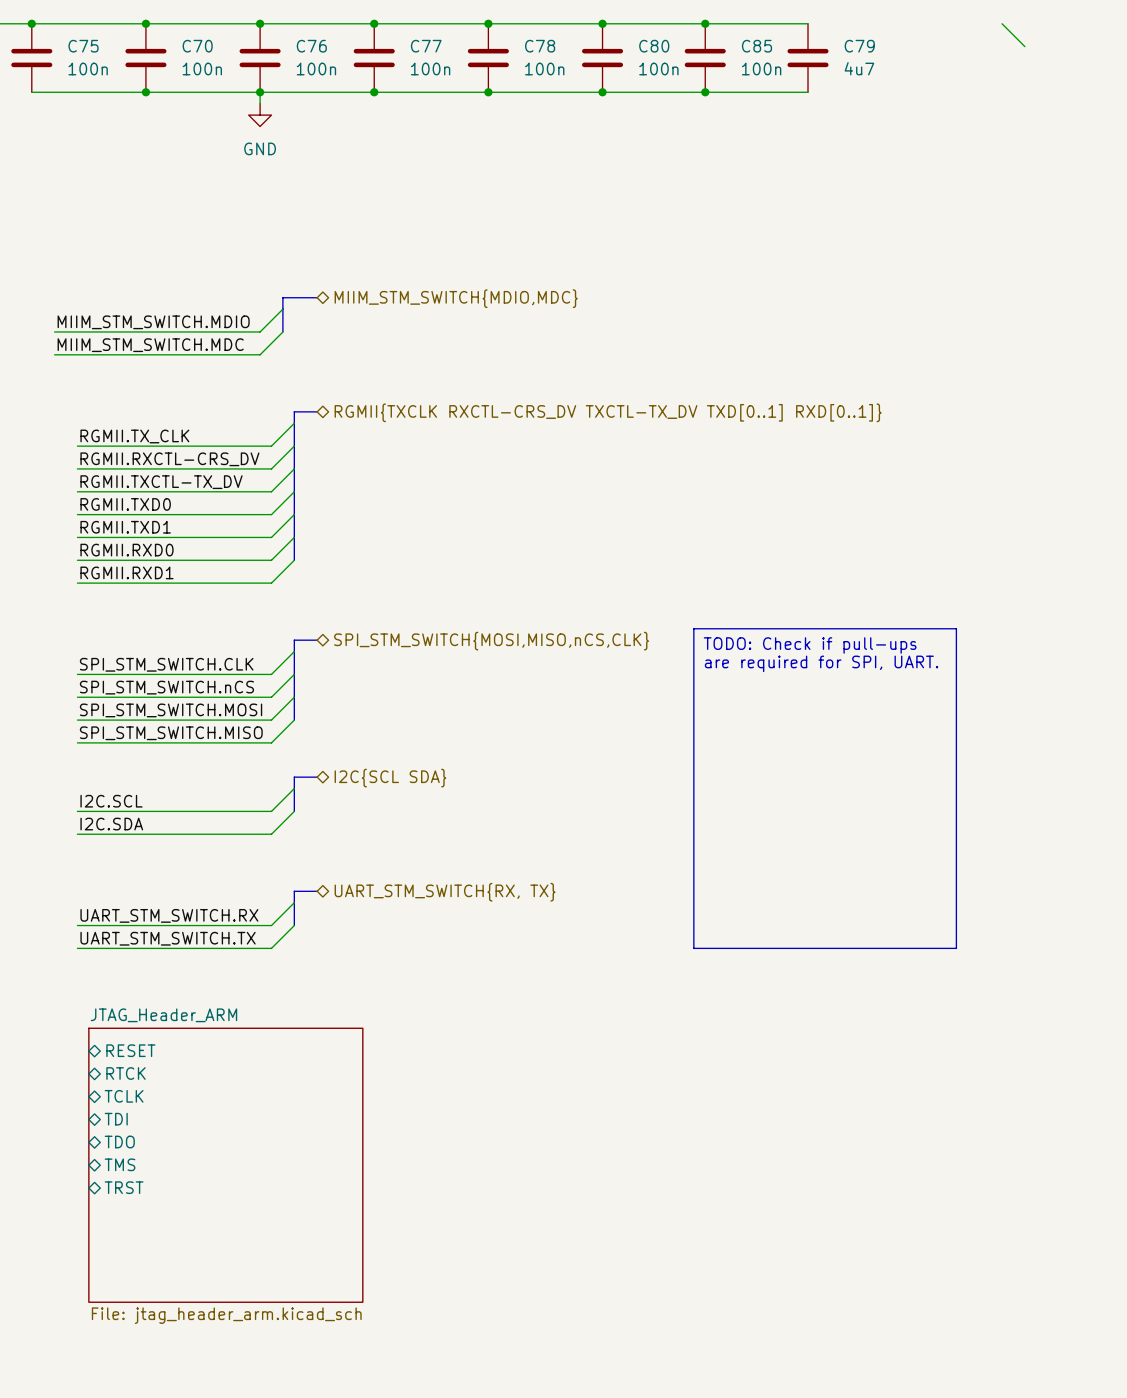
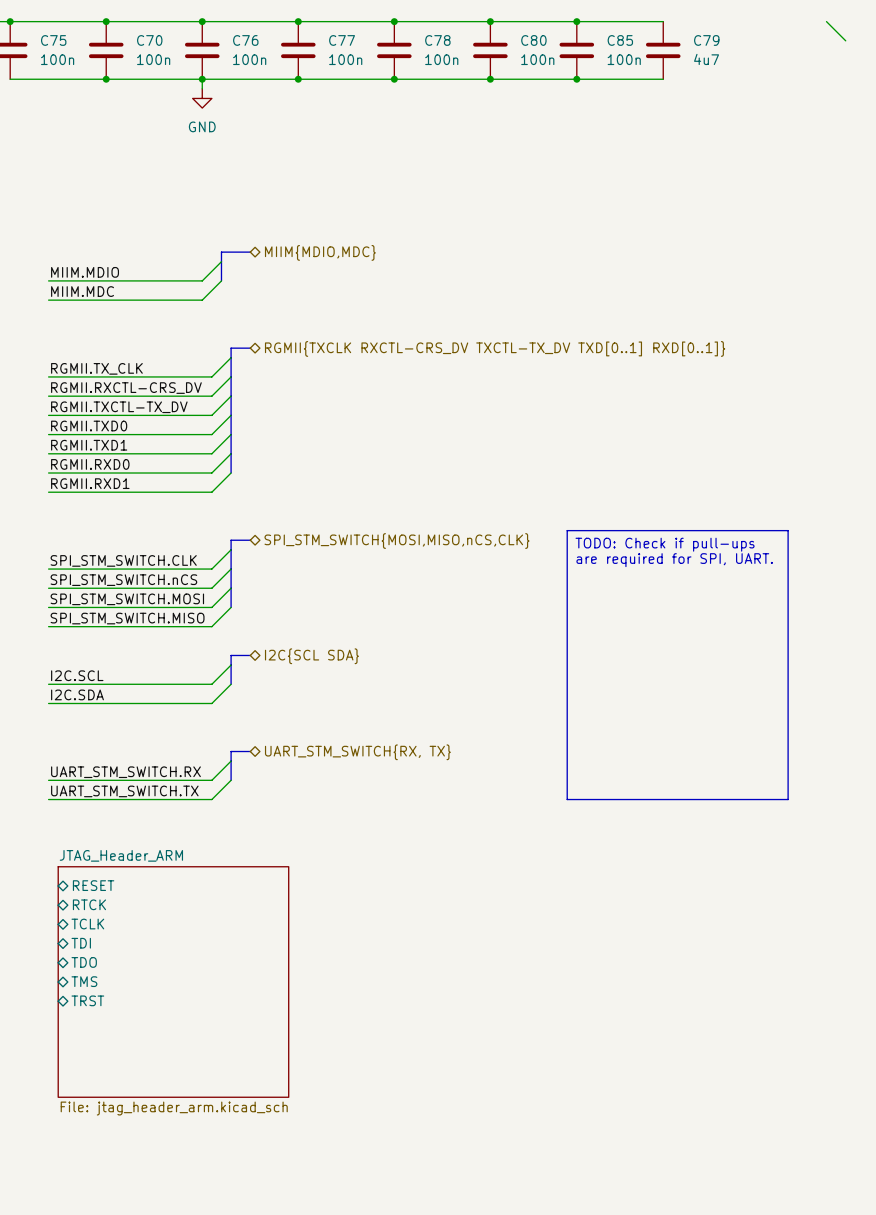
hierarchical label: MIIM_STM_SWITCH{MDIO,MDC} (456, 298) -> MIIM{MDIO,MDC} (320, 252)
label: MIIM_STM_SWITCH.MDIO (153, 322) -> MIIM.MDIO (85, 272)
wire: (54, 331) (77, 331) -> none
label: none -> MIIM.MDC (82, 291)
label: MIIM_STM_SWITCH.MDC (150, 345) -> none
wire: (54, 354) (77, 354) -> none

